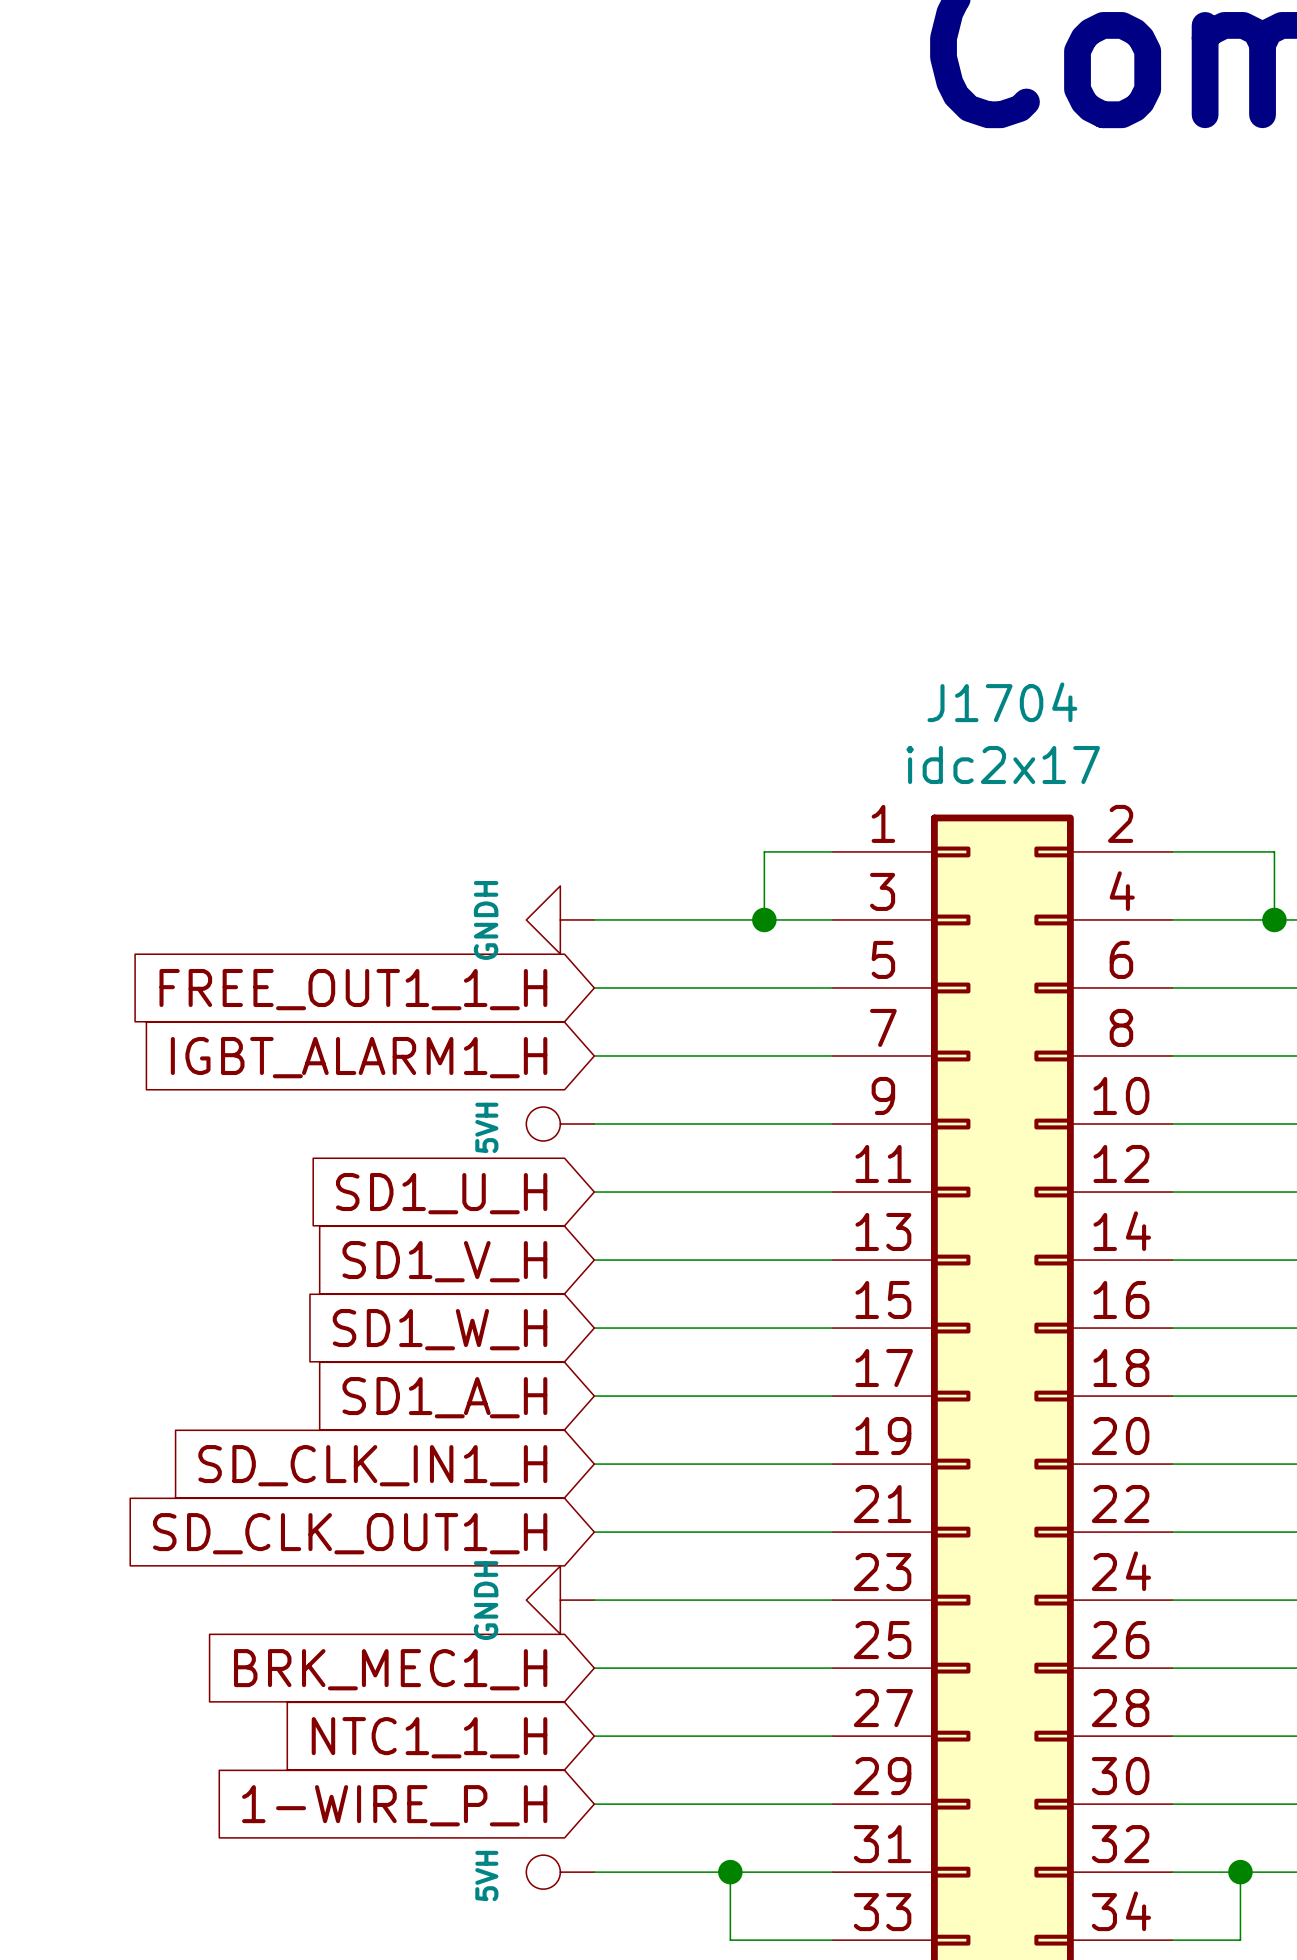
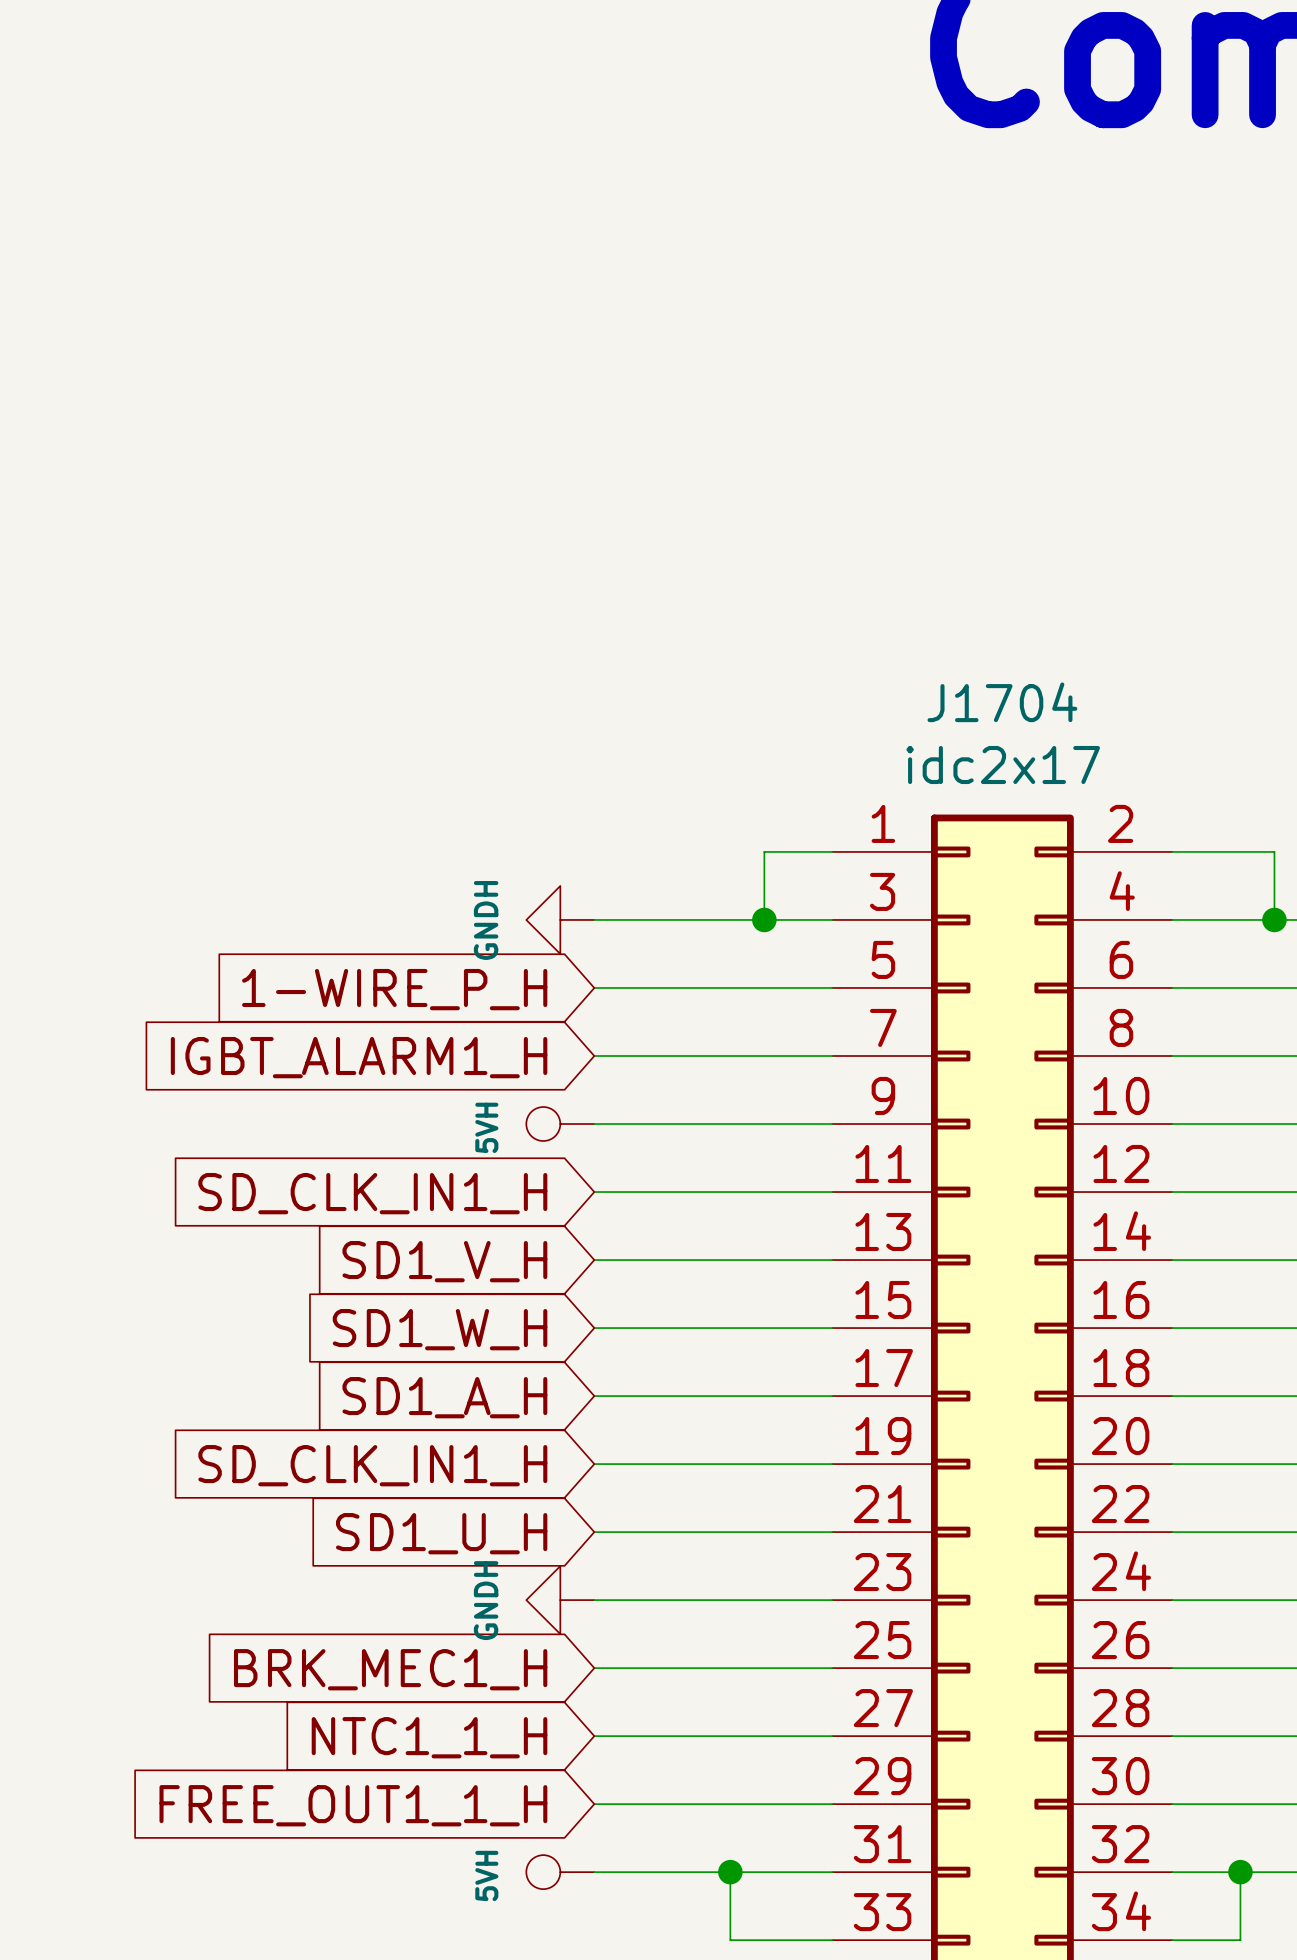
global label: FREE_OUT1_1_H (353, 989) -> 1-WIRE_P_H (394, 989)
global label: SD1_U_H (441, 1193) -> SD_CLK_IN1_H (372, 1193)
global label: SD_CLK_OUT1_H (350, 1533) -> SD1_U_H (441, 1533)
global label: 1-WIRE_P_H (394, 1805) -> FREE_OUT1_1_H (353, 1805)

